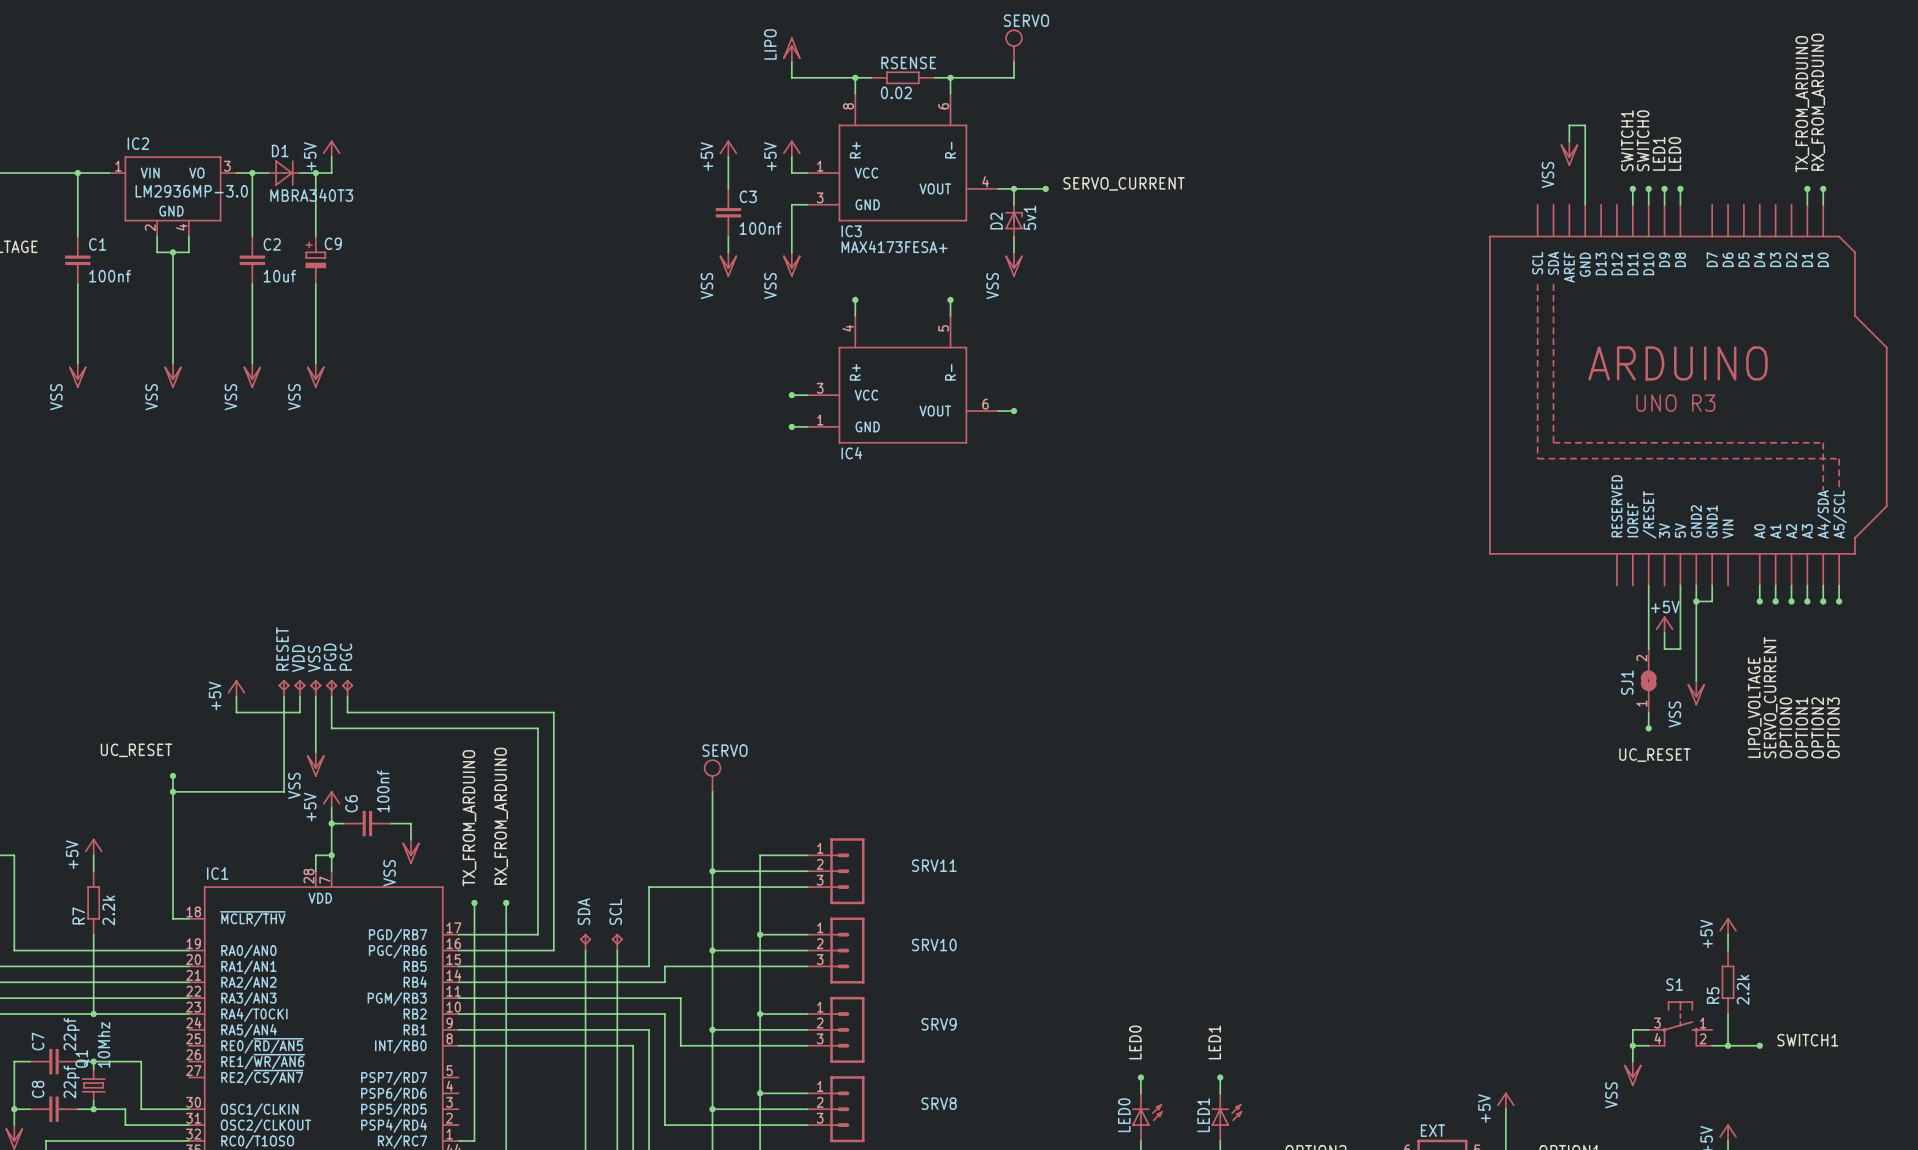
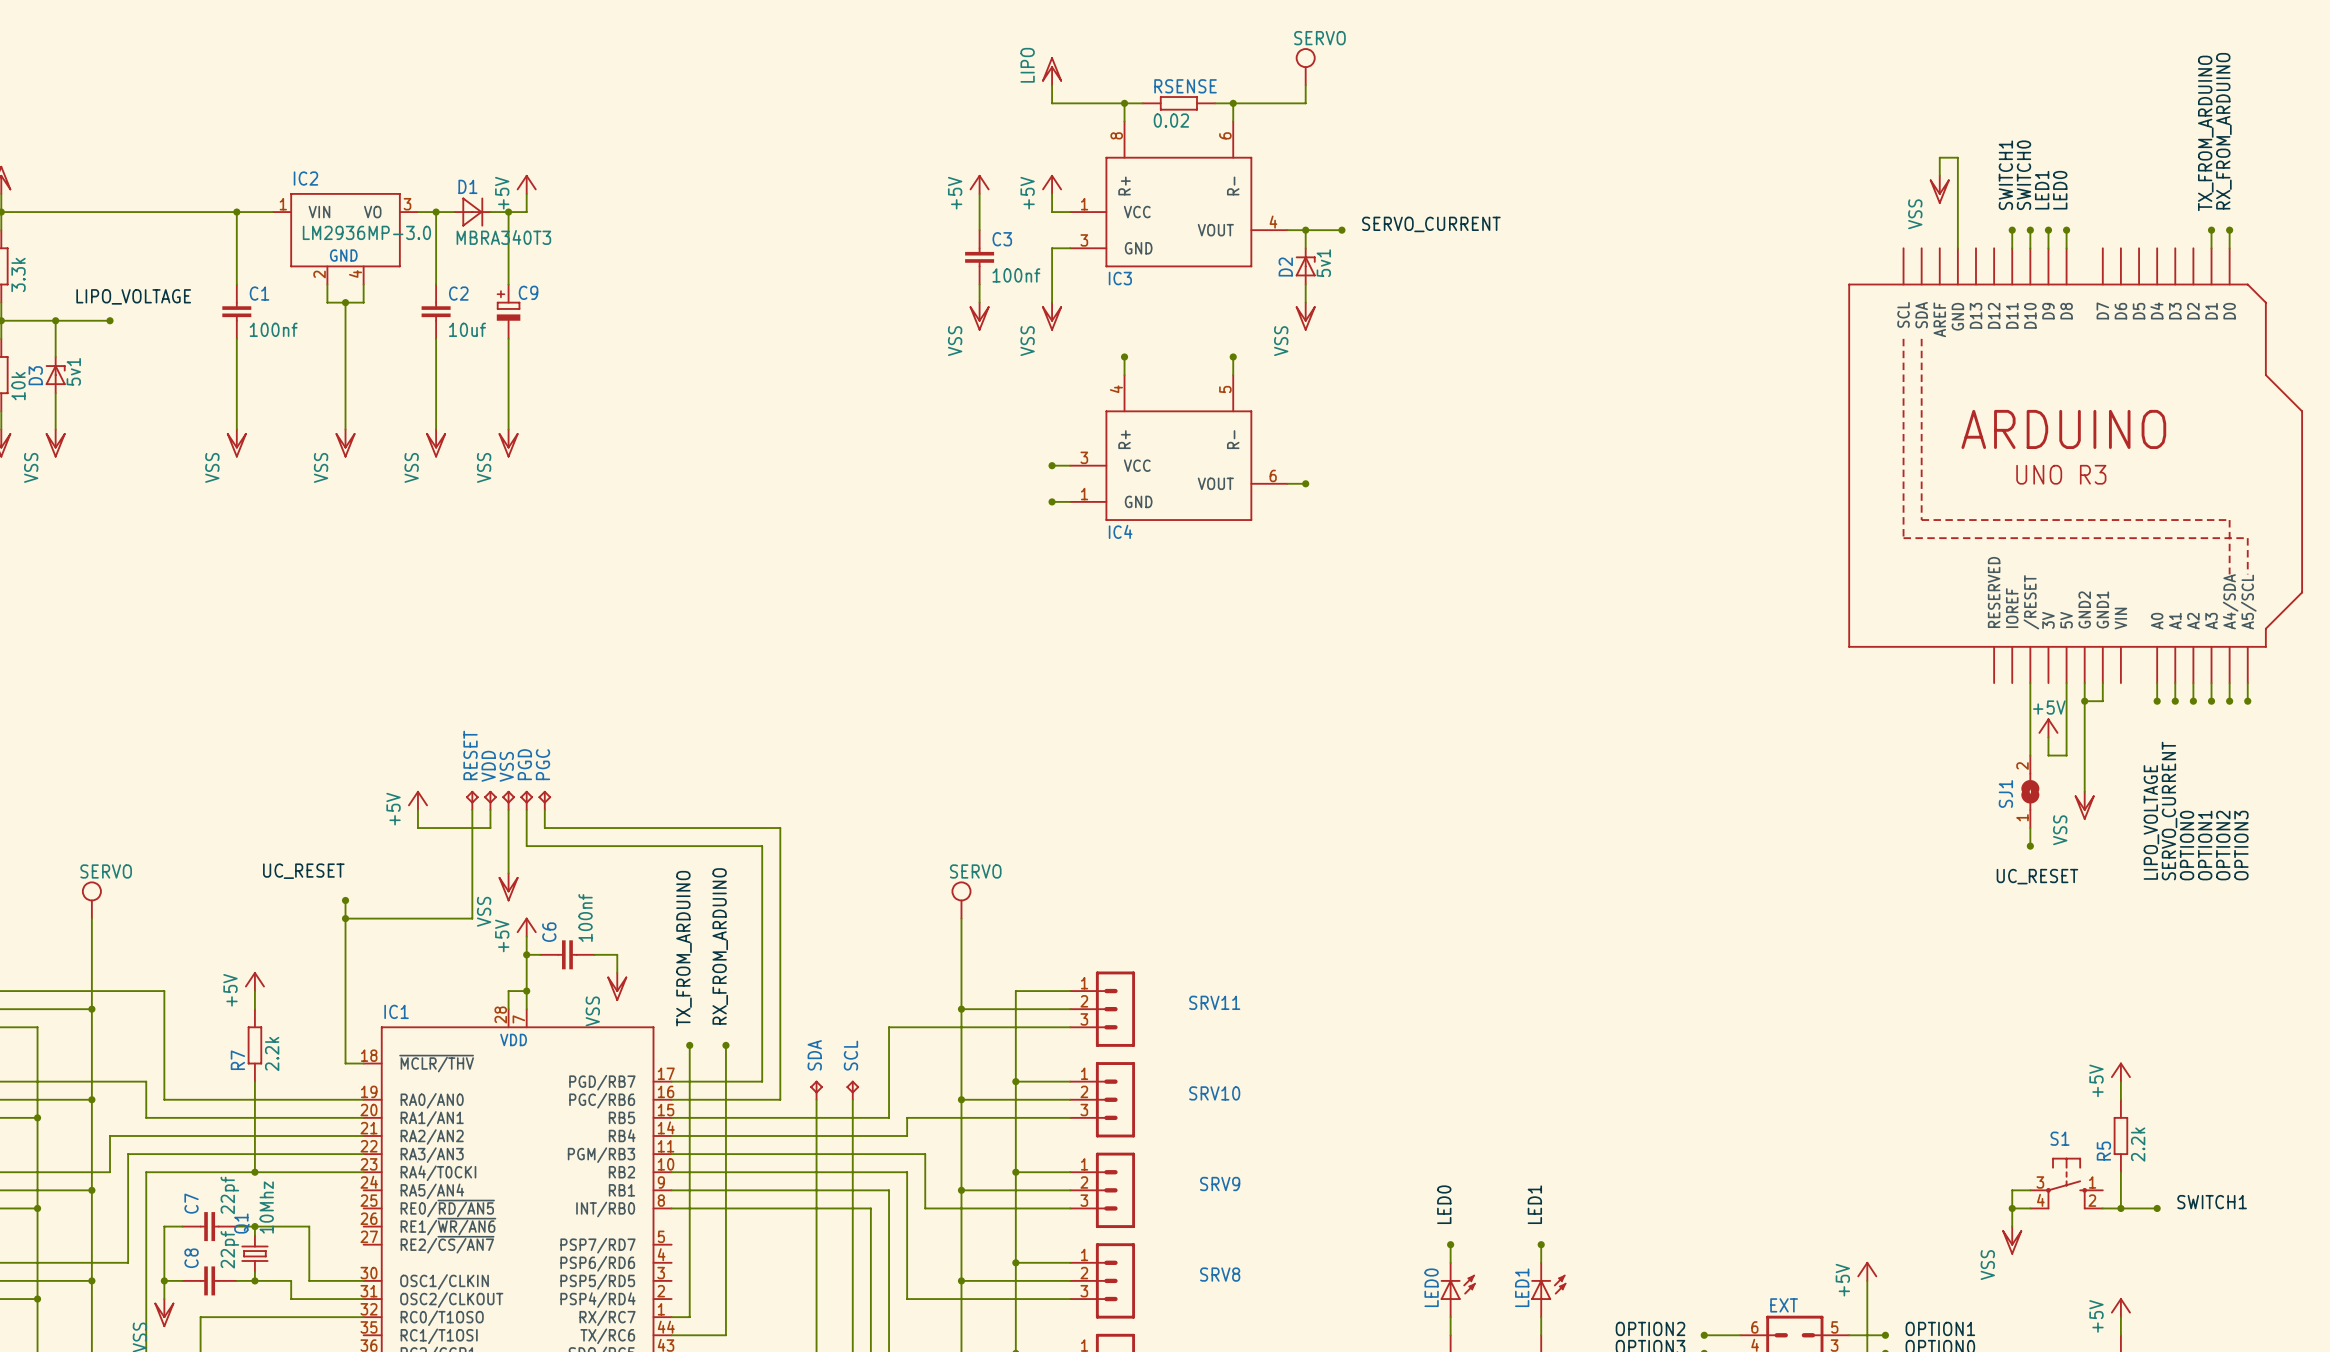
IC3 value: MAX4173FESA+ (894, 246) -> none

